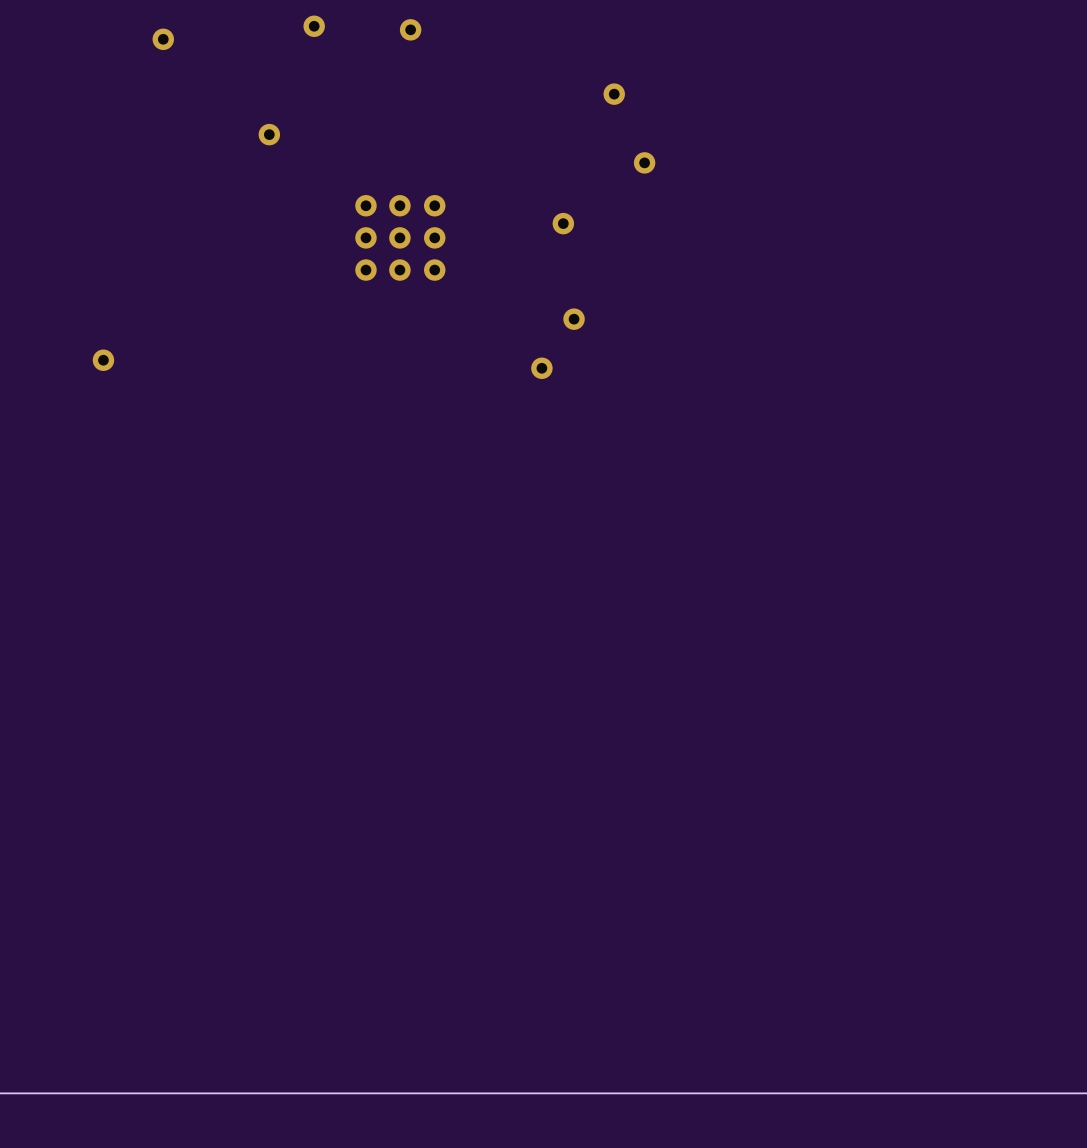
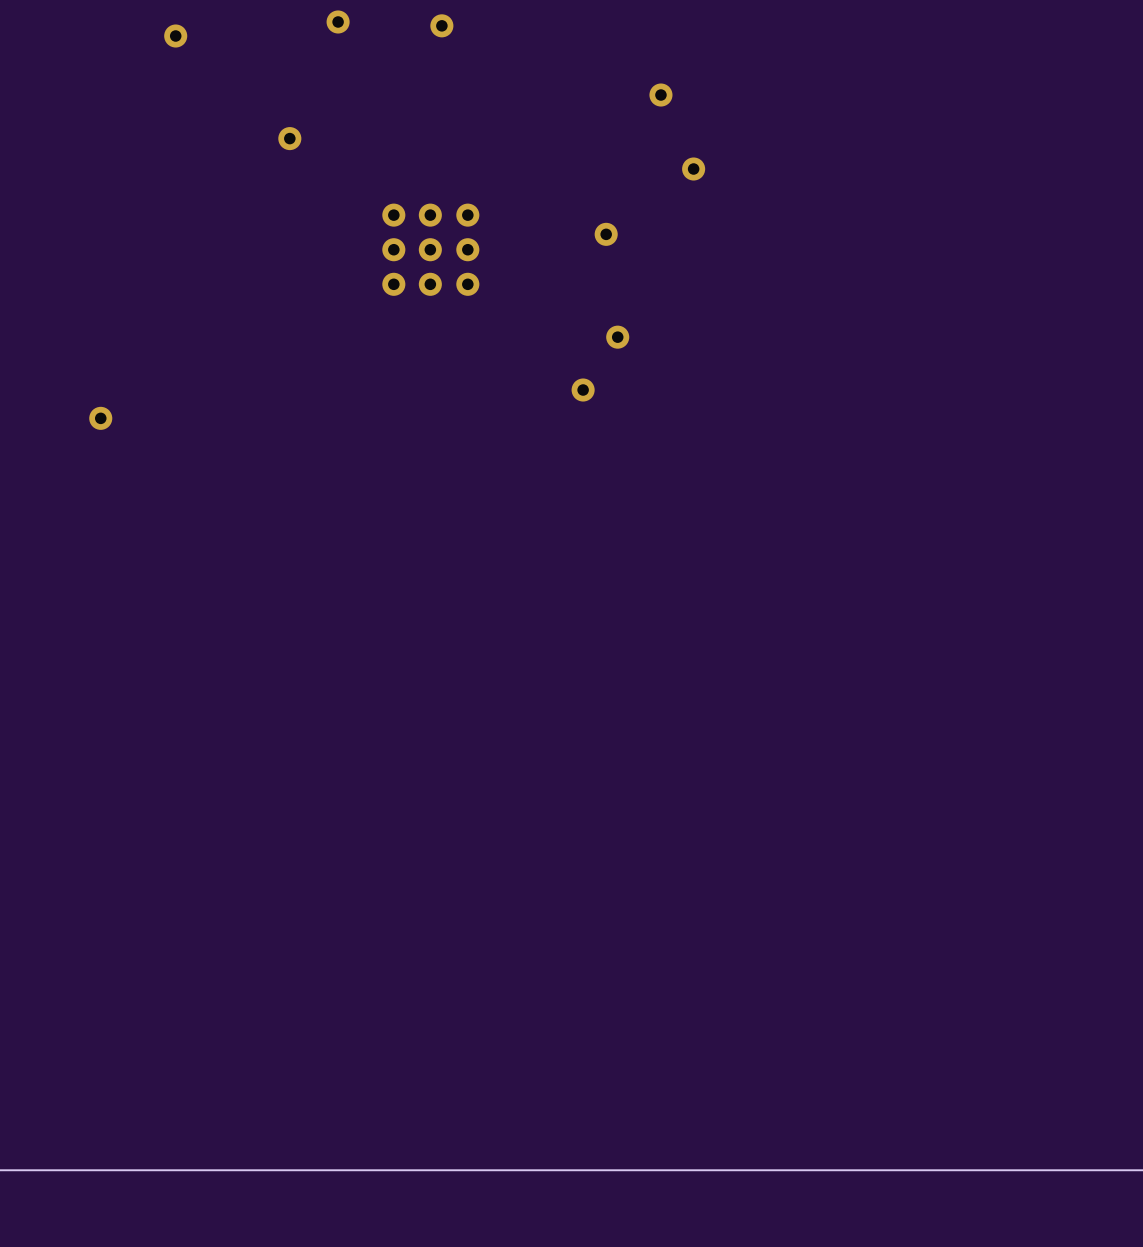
via position: (103, 360) -> (100, 418)

